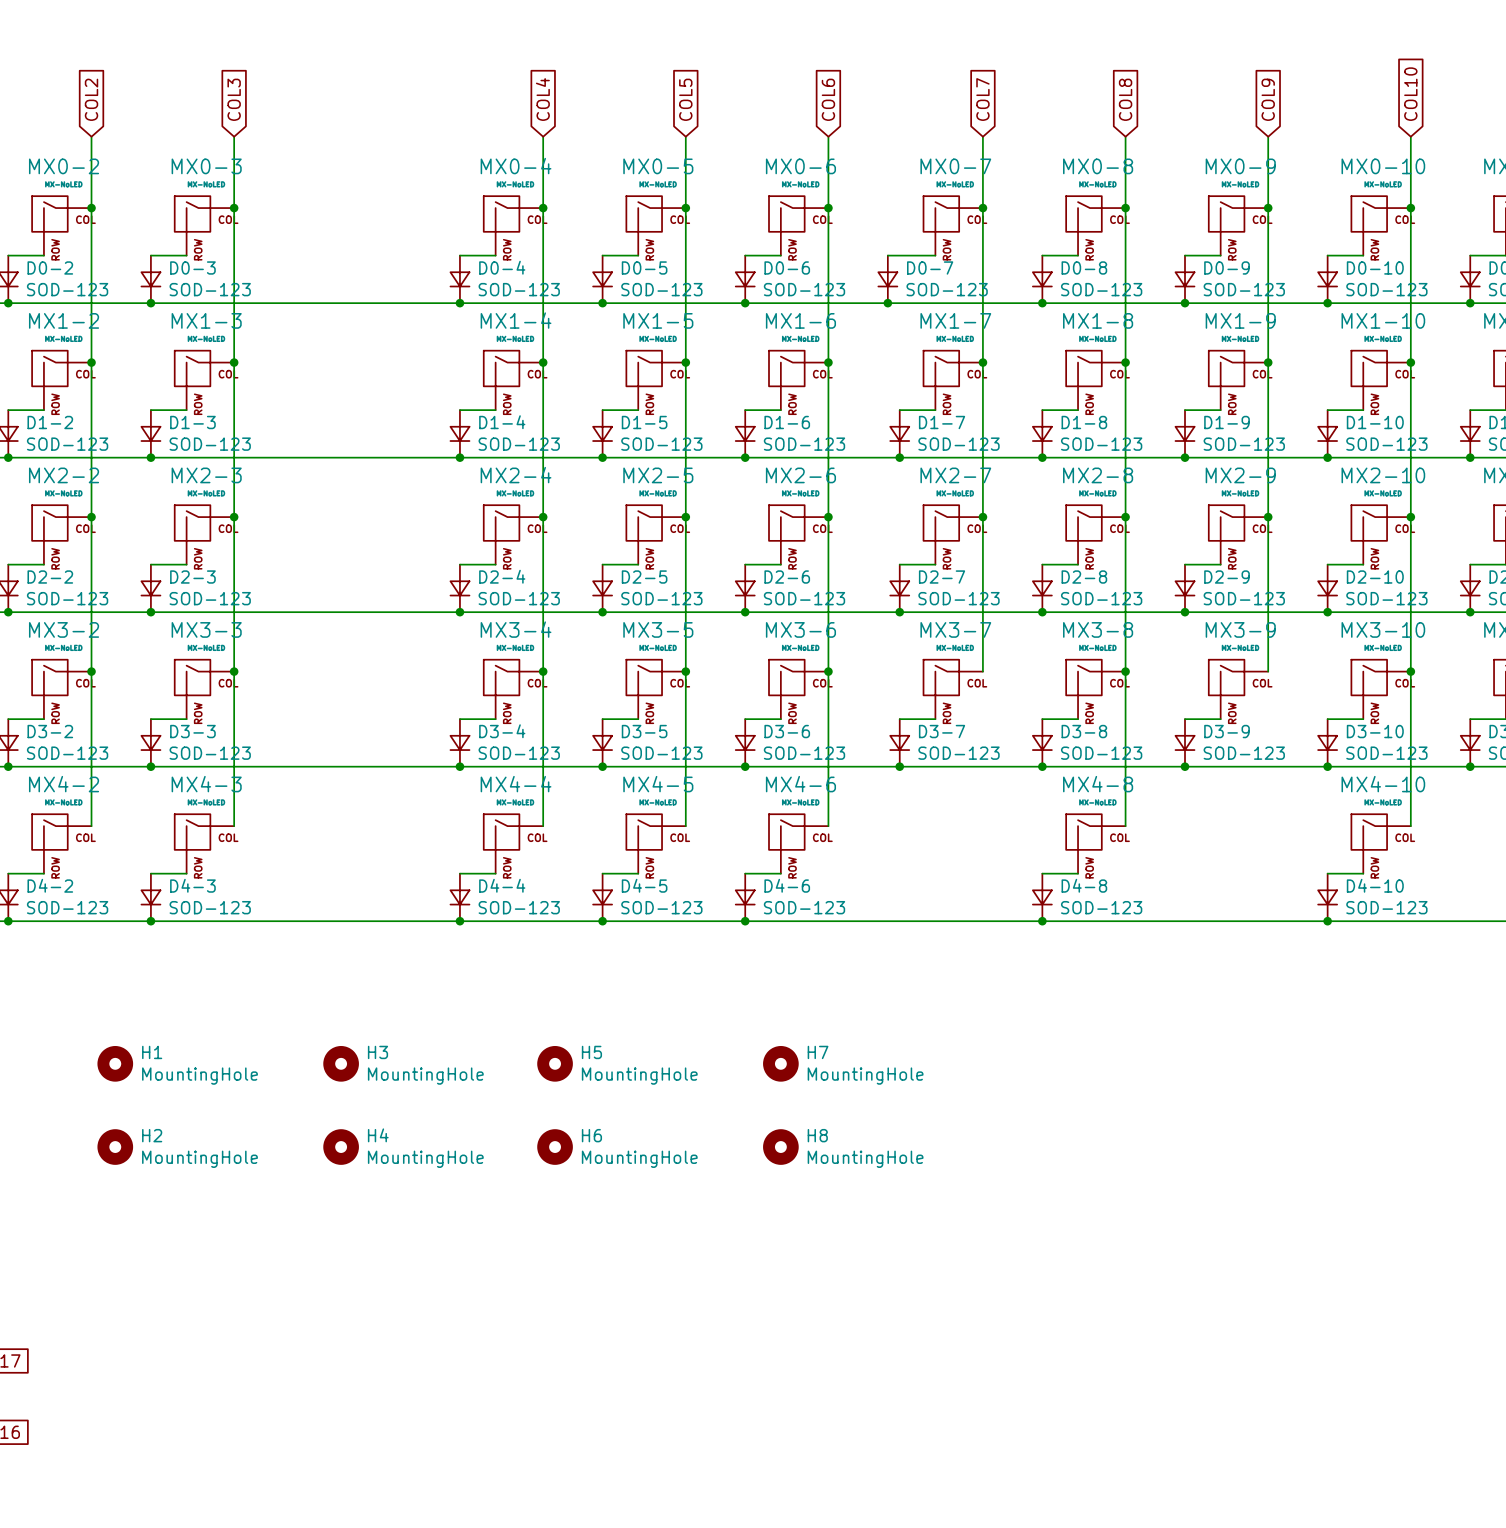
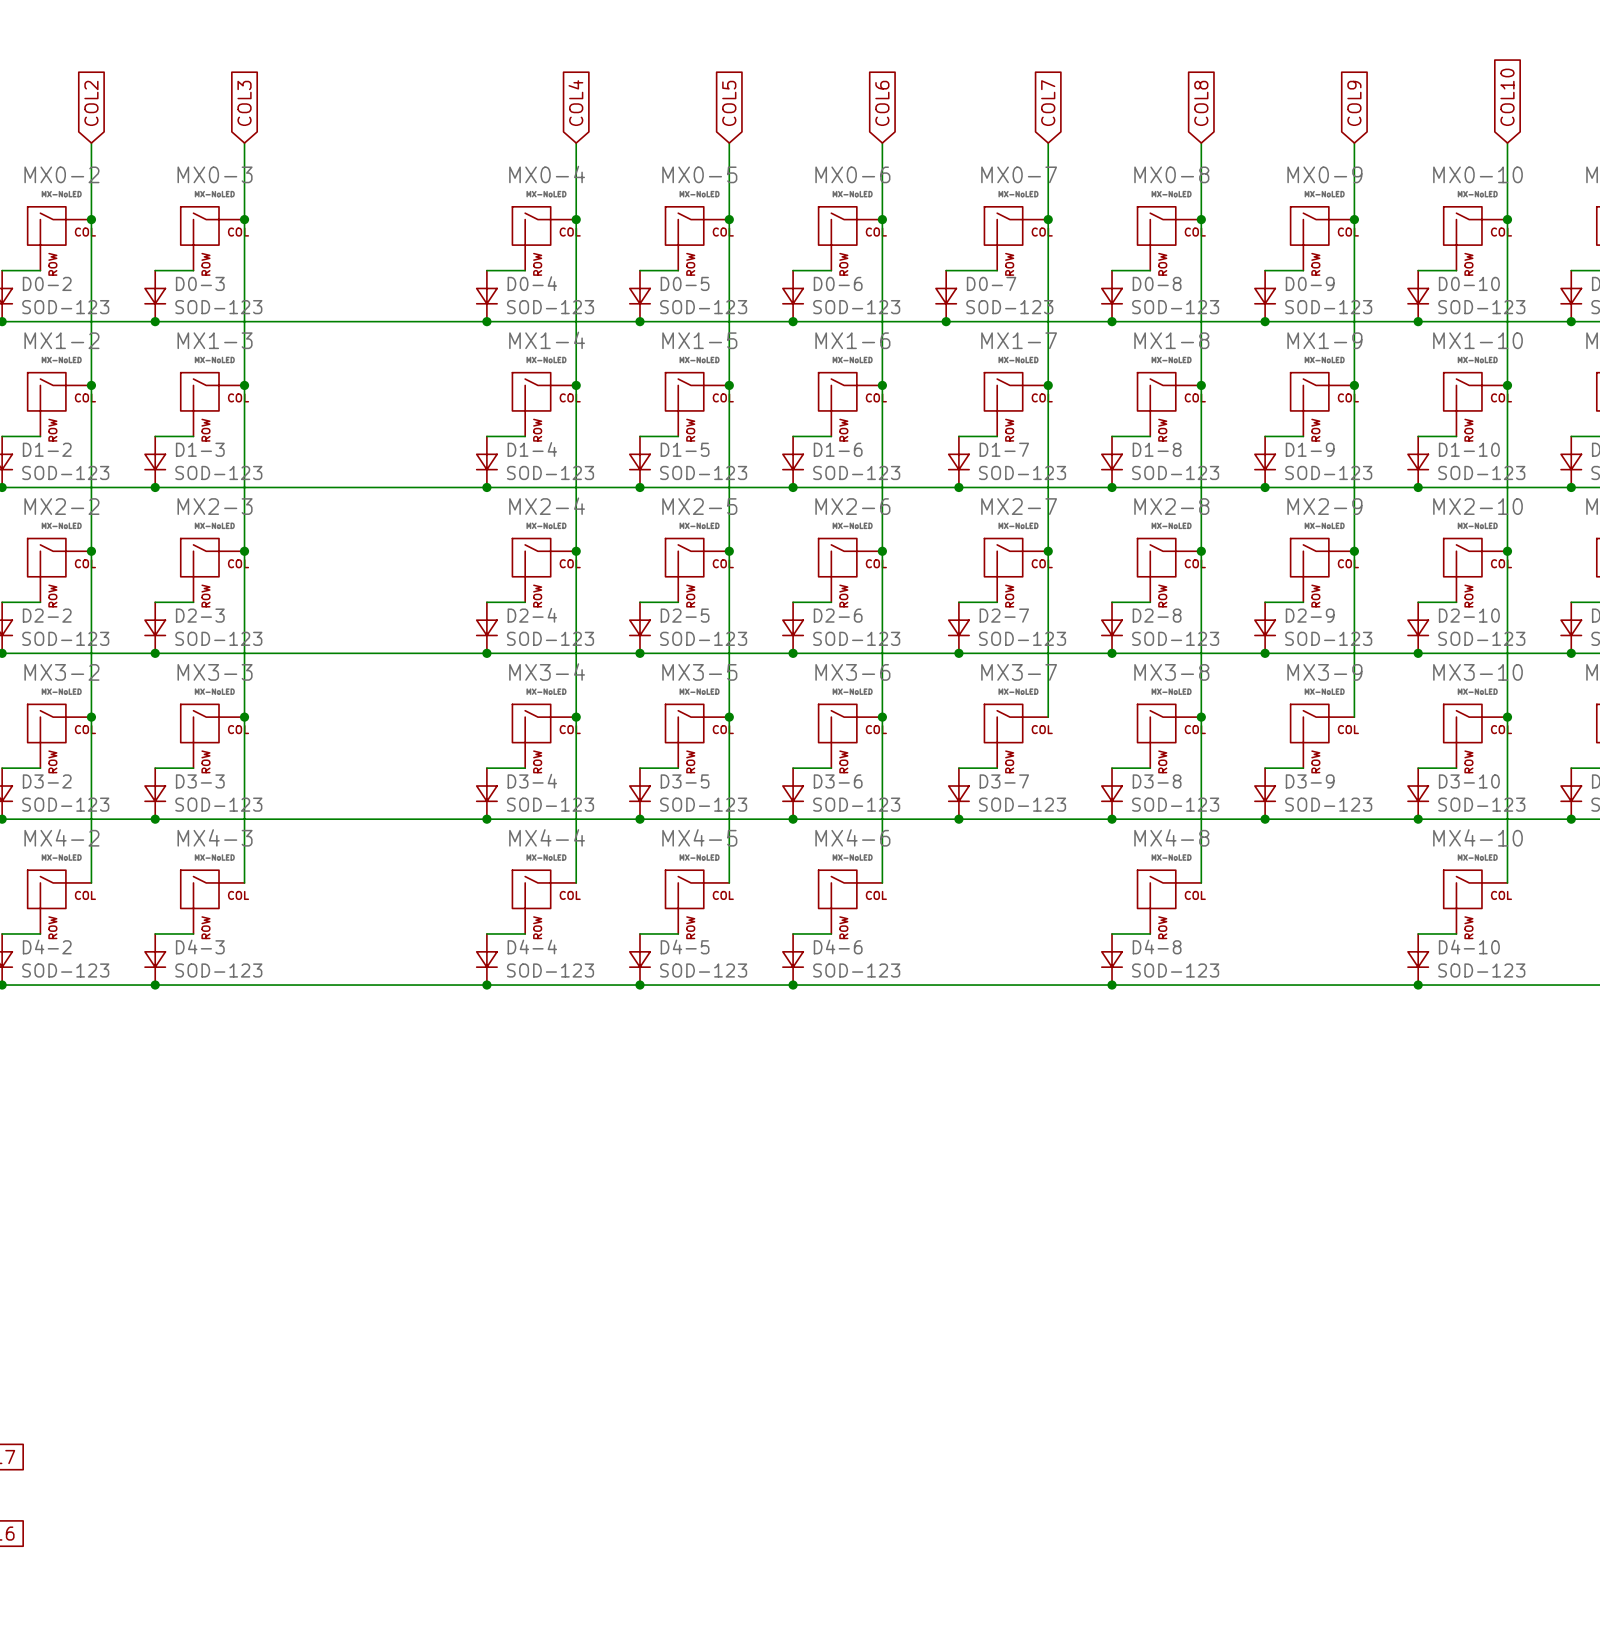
H1: MountingHole (115, 1063) -> none
H3: MountingHole (341, 1063) -> none
H5: MountingHole (555, 1063) -> none
H7: MountingHole (780, 1063) -> none
H2: MountingHole (115, 1147) -> none
H4: MountingHole (341, 1147) -> none
H6: MountingHole (555, 1147) -> none
H8: MountingHole (780, 1147) -> none

